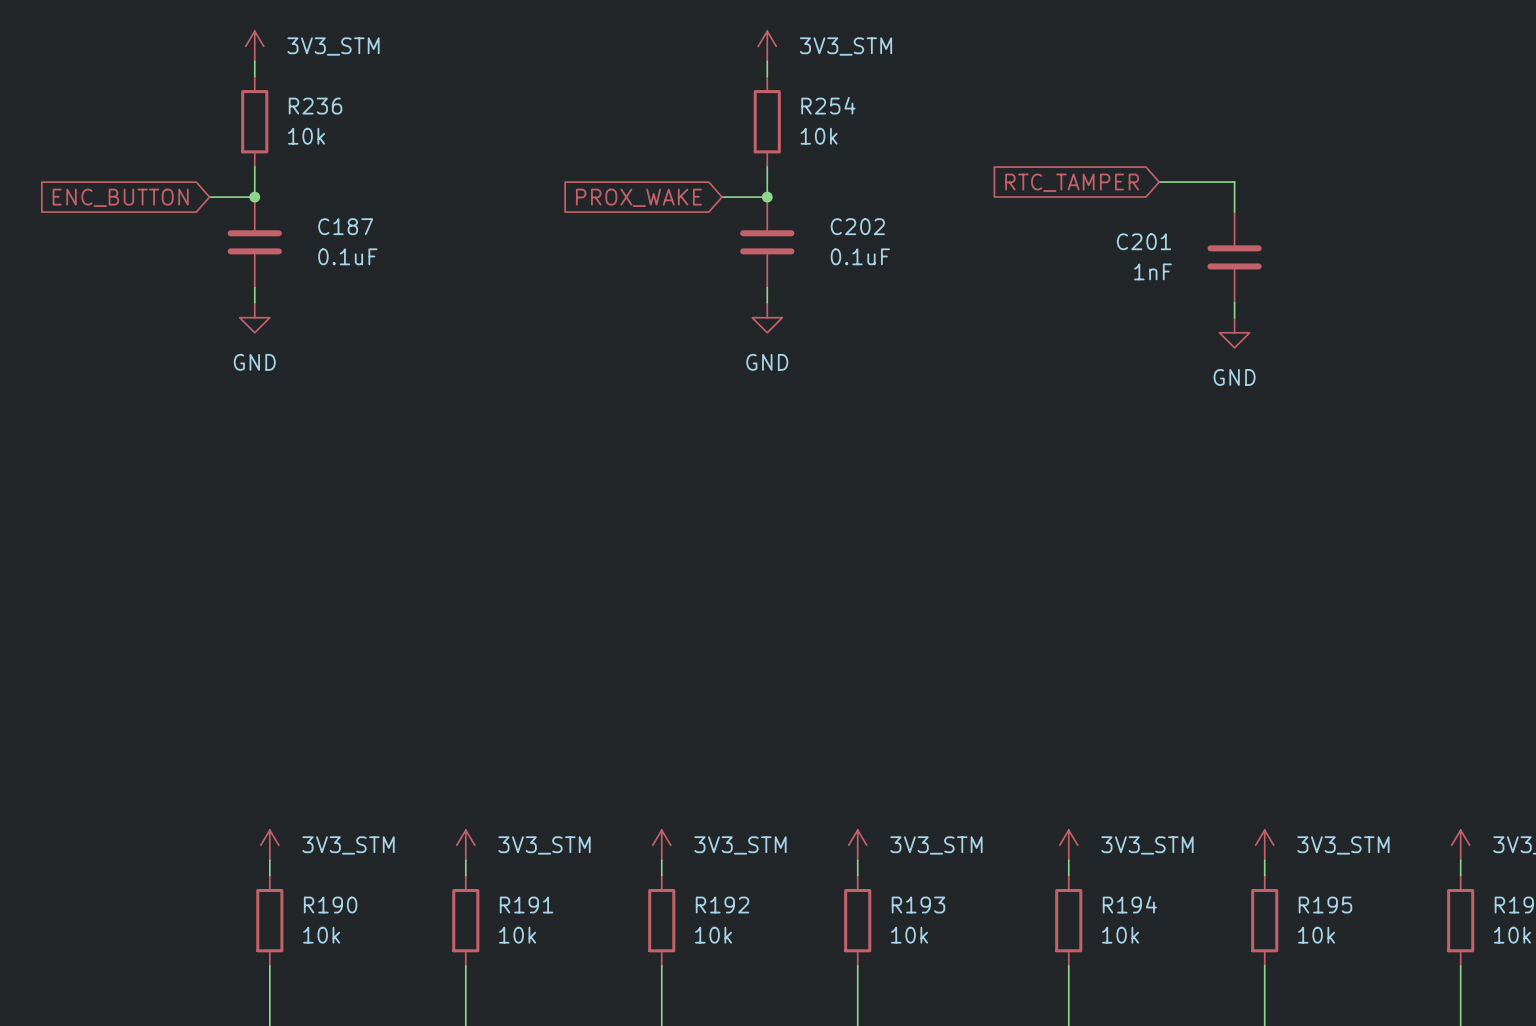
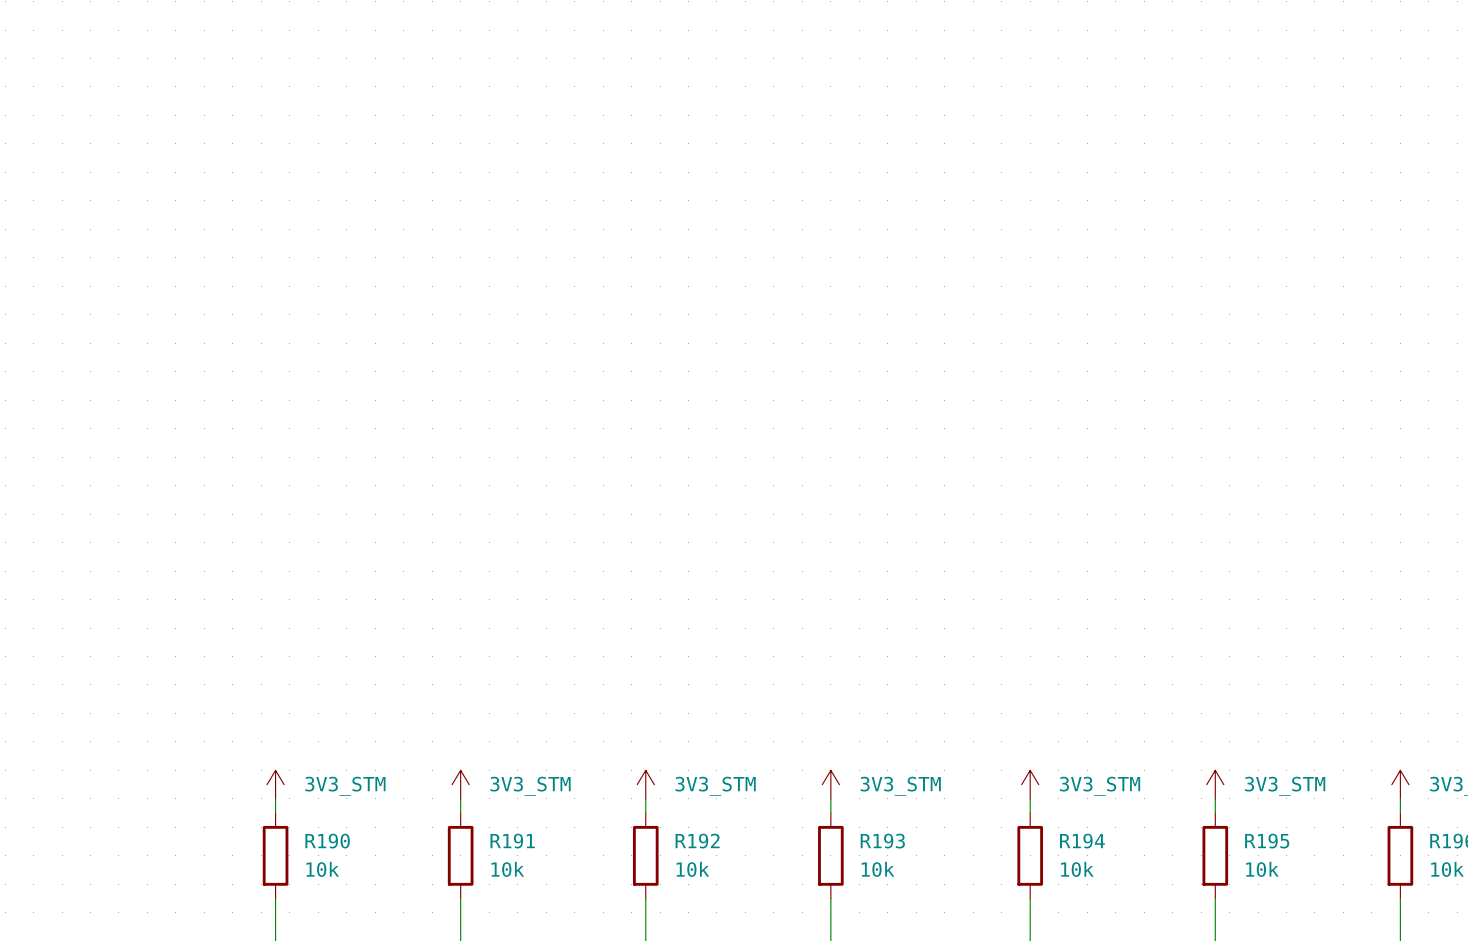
power symbol: 3V3_STM (254, 46) -> none
power symbol: 3V3_STM (767, 46) -> none
wire: (254, 61) (254, 76) -> none
wire: (767, 61) (767, 76) -> none
R236: 10k (254, 121) -> none
R254: 10k (767, 121) -> none
wire: (254, 166) (254, 197) (209, 197) -> none
wire: (767, 166) (767, 197) (722, 197) -> none
global label: RTC_TAMPER (1072, 182) -> none
wire: (1159, 182) (1234, 182) (1234, 212) -> none
global label: ENC_BUTTON (120, 197) -> none
junction: (254, 197) -> none
global label: PROX_WAKE (638, 197) -> none
junction: (767, 197) -> none
C187: 0.1uF (254, 242) -> none
C202: 0.1uF (767, 242) -> none
C201: 1nF (1234, 257) -> none
wire: (254, 287) (254, 302) -> none
wire: (767, 287) (767, 302) -> none
wire: (1234, 302) (1234, 317) -> none
power symbol: GND (254, 317) -> none
power symbol: GND (767, 317) -> none
power symbol: GND (1234, 332) -> none

